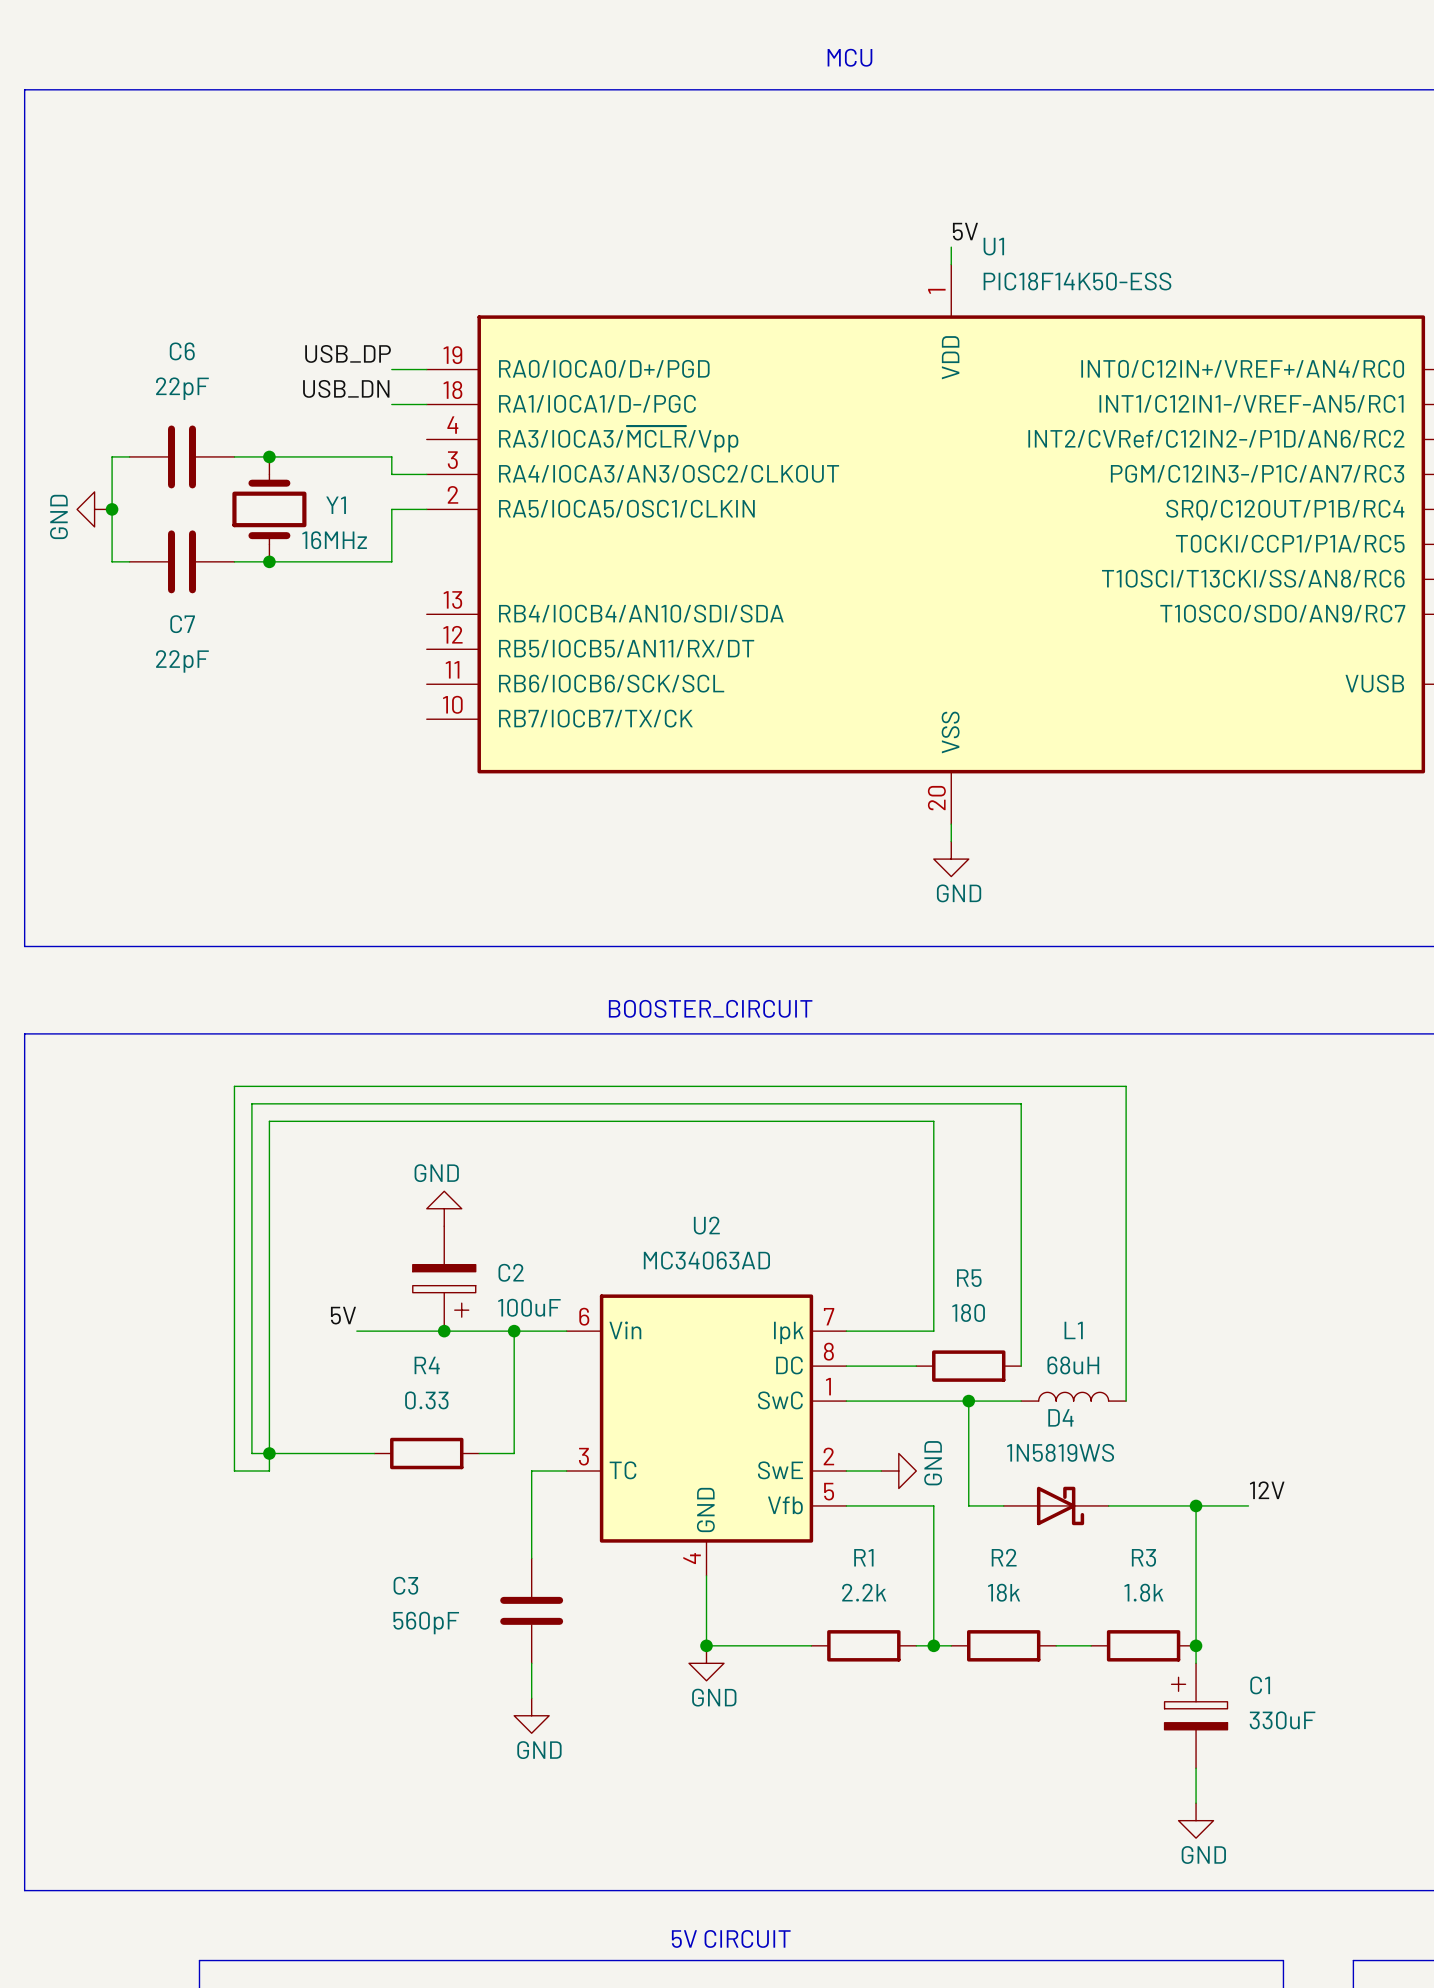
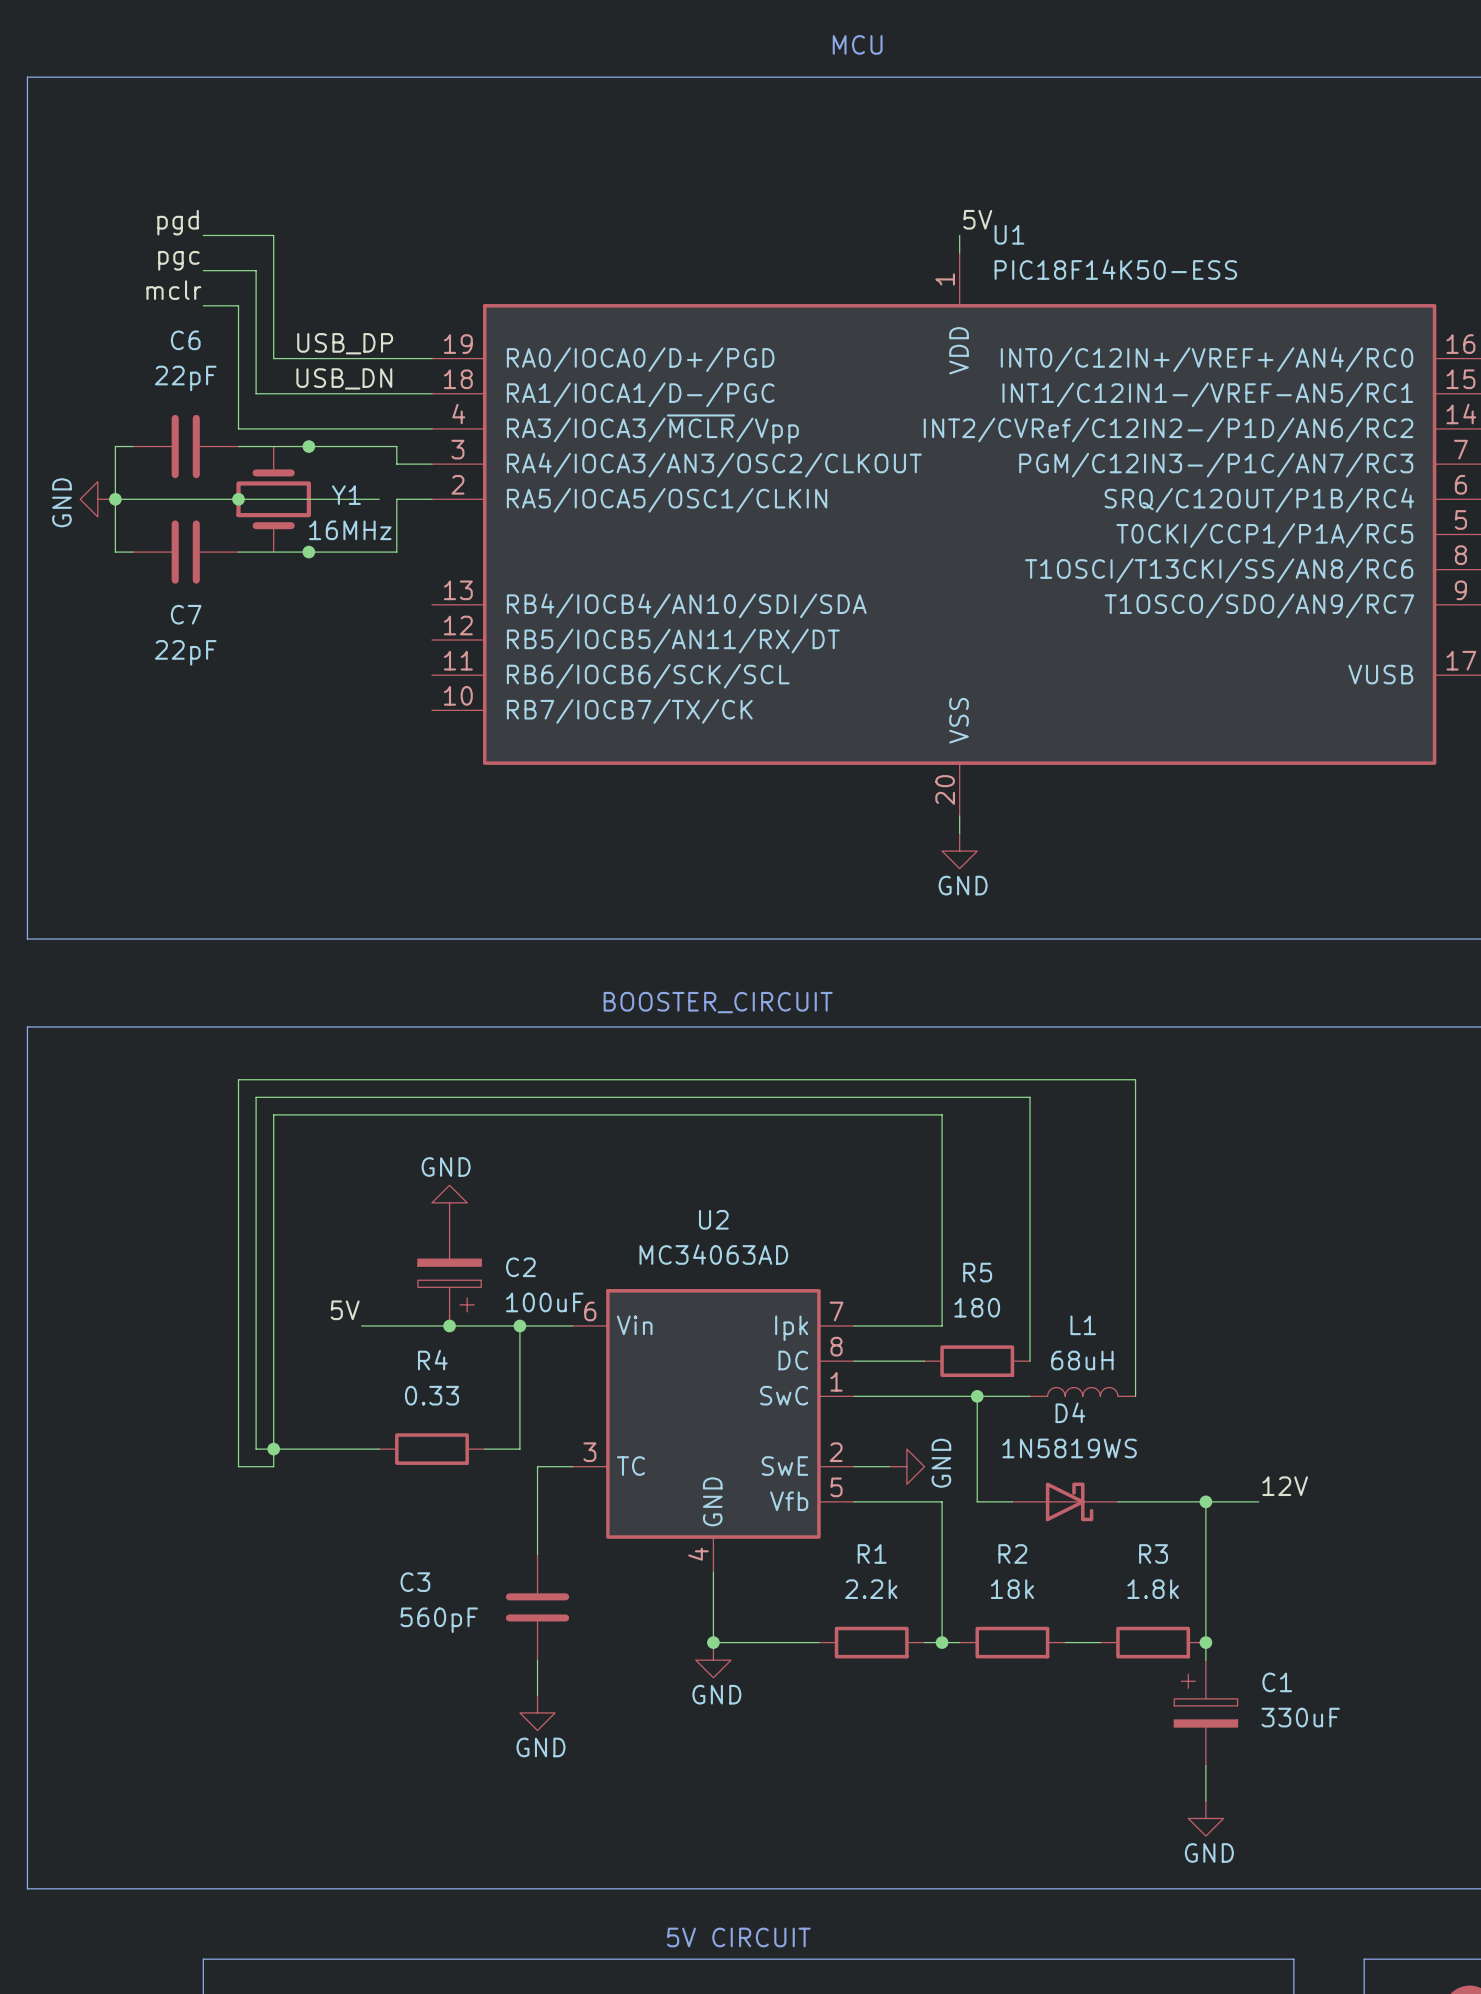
label: none -> pgd (178, 222)
wire: none -> (203, 235) (273, 235) (273, 358) (396, 358)
label: none -> pgc (178, 260)
wire: none -> (203, 270) (256, 270) (256, 393) (396, 393)
label: none -> mclr (173, 290)
wire: none -> (203, 305) (238, 305) (238, 428) (431, 428)
junction: (269, 456) -> none
junction: none -> (308, 446)
wire: none -> (115, 499) (379, 499)
junction: none -> (238, 499)
junction: (269, 561) -> none
junction: none -> (308, 552)

